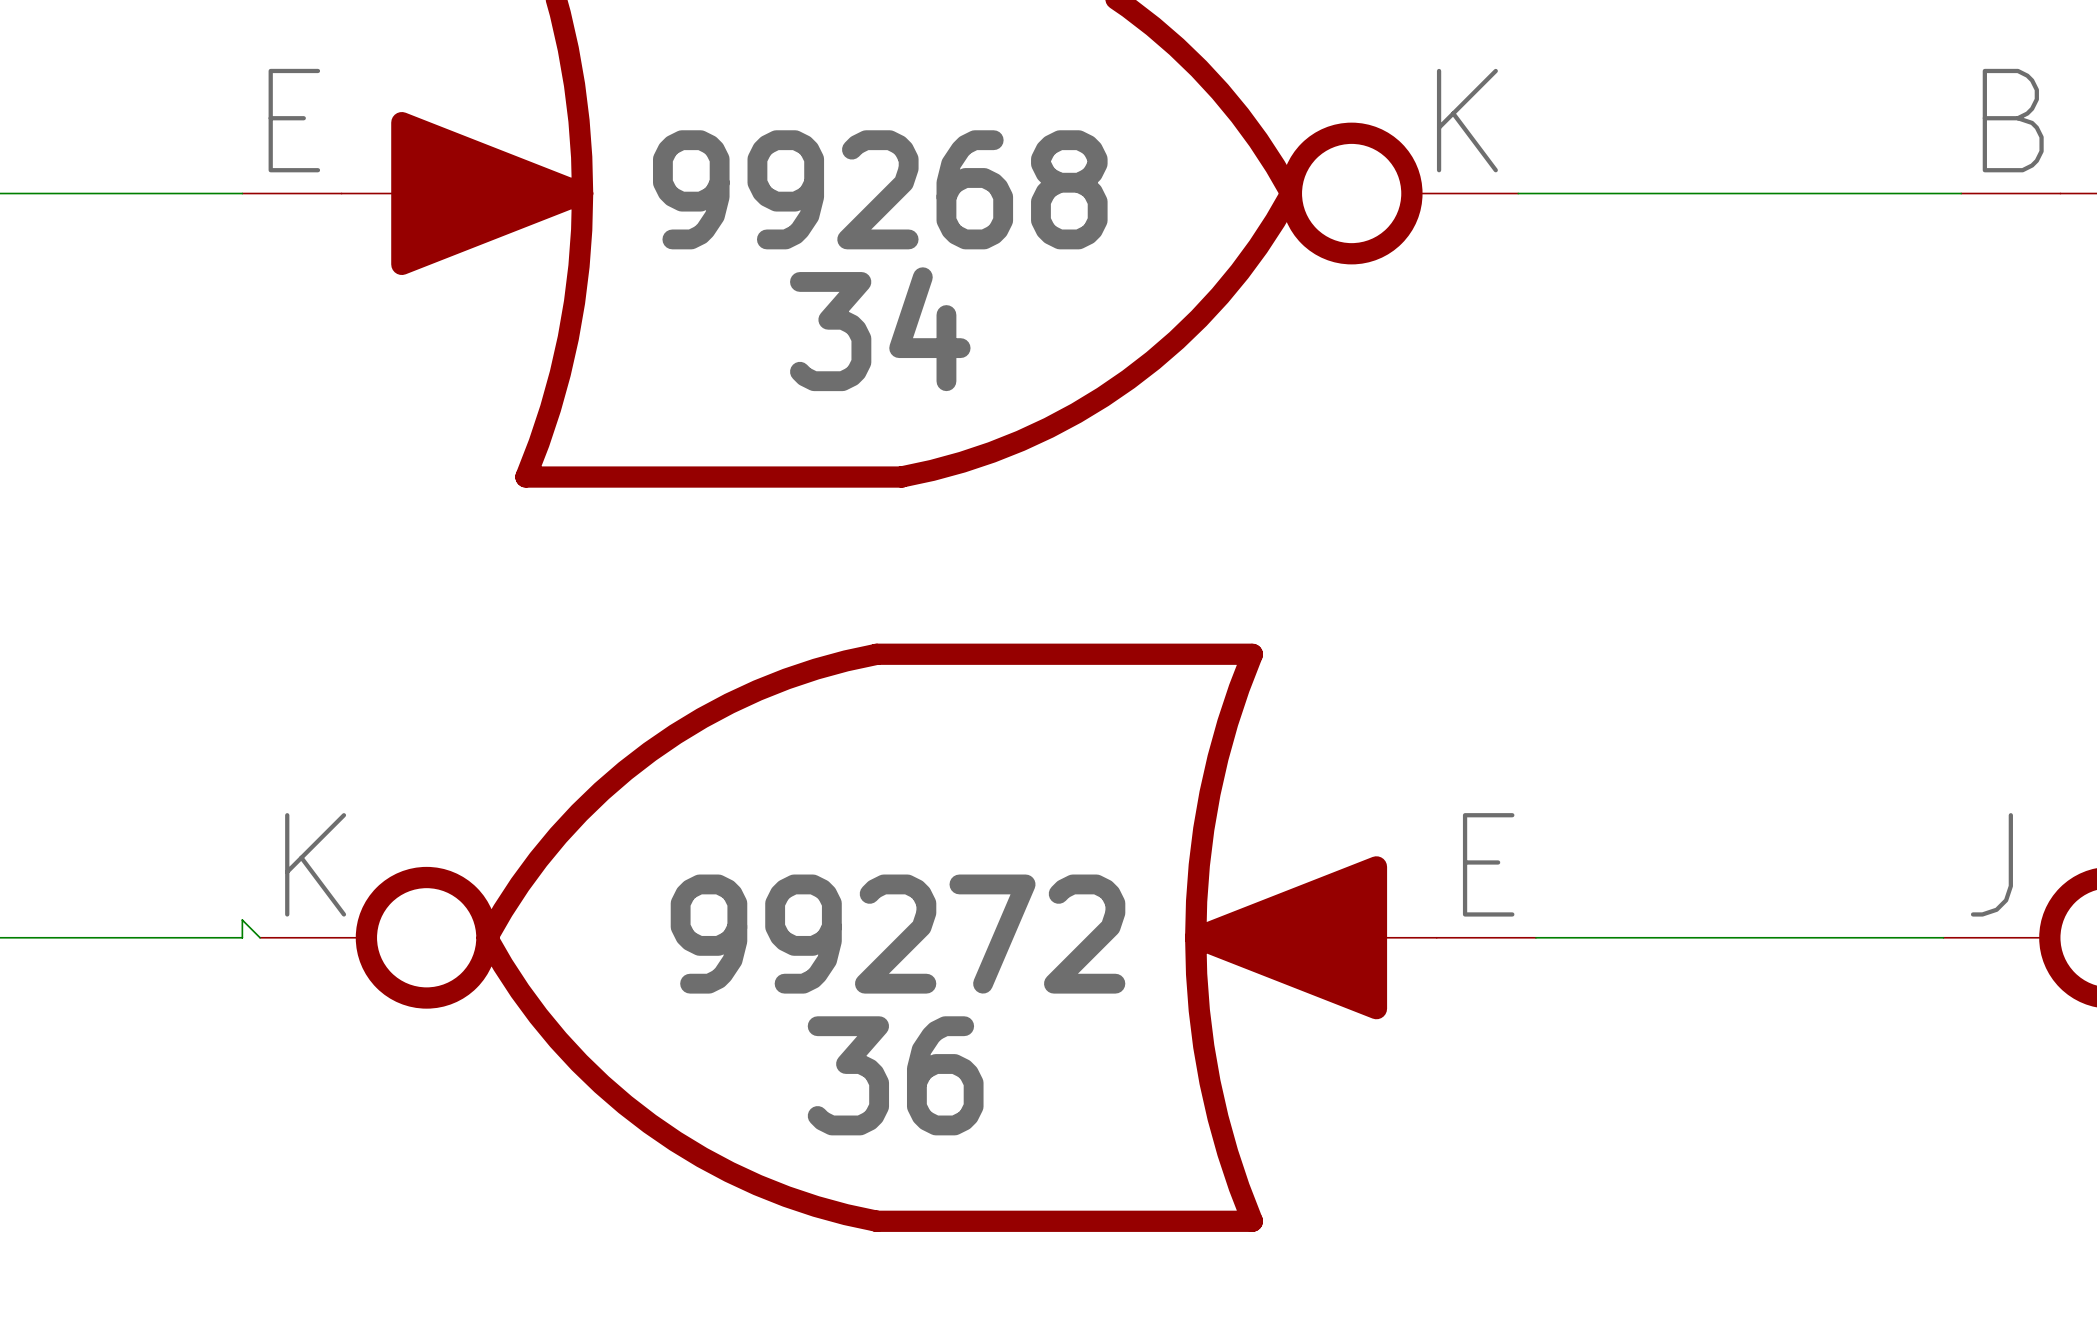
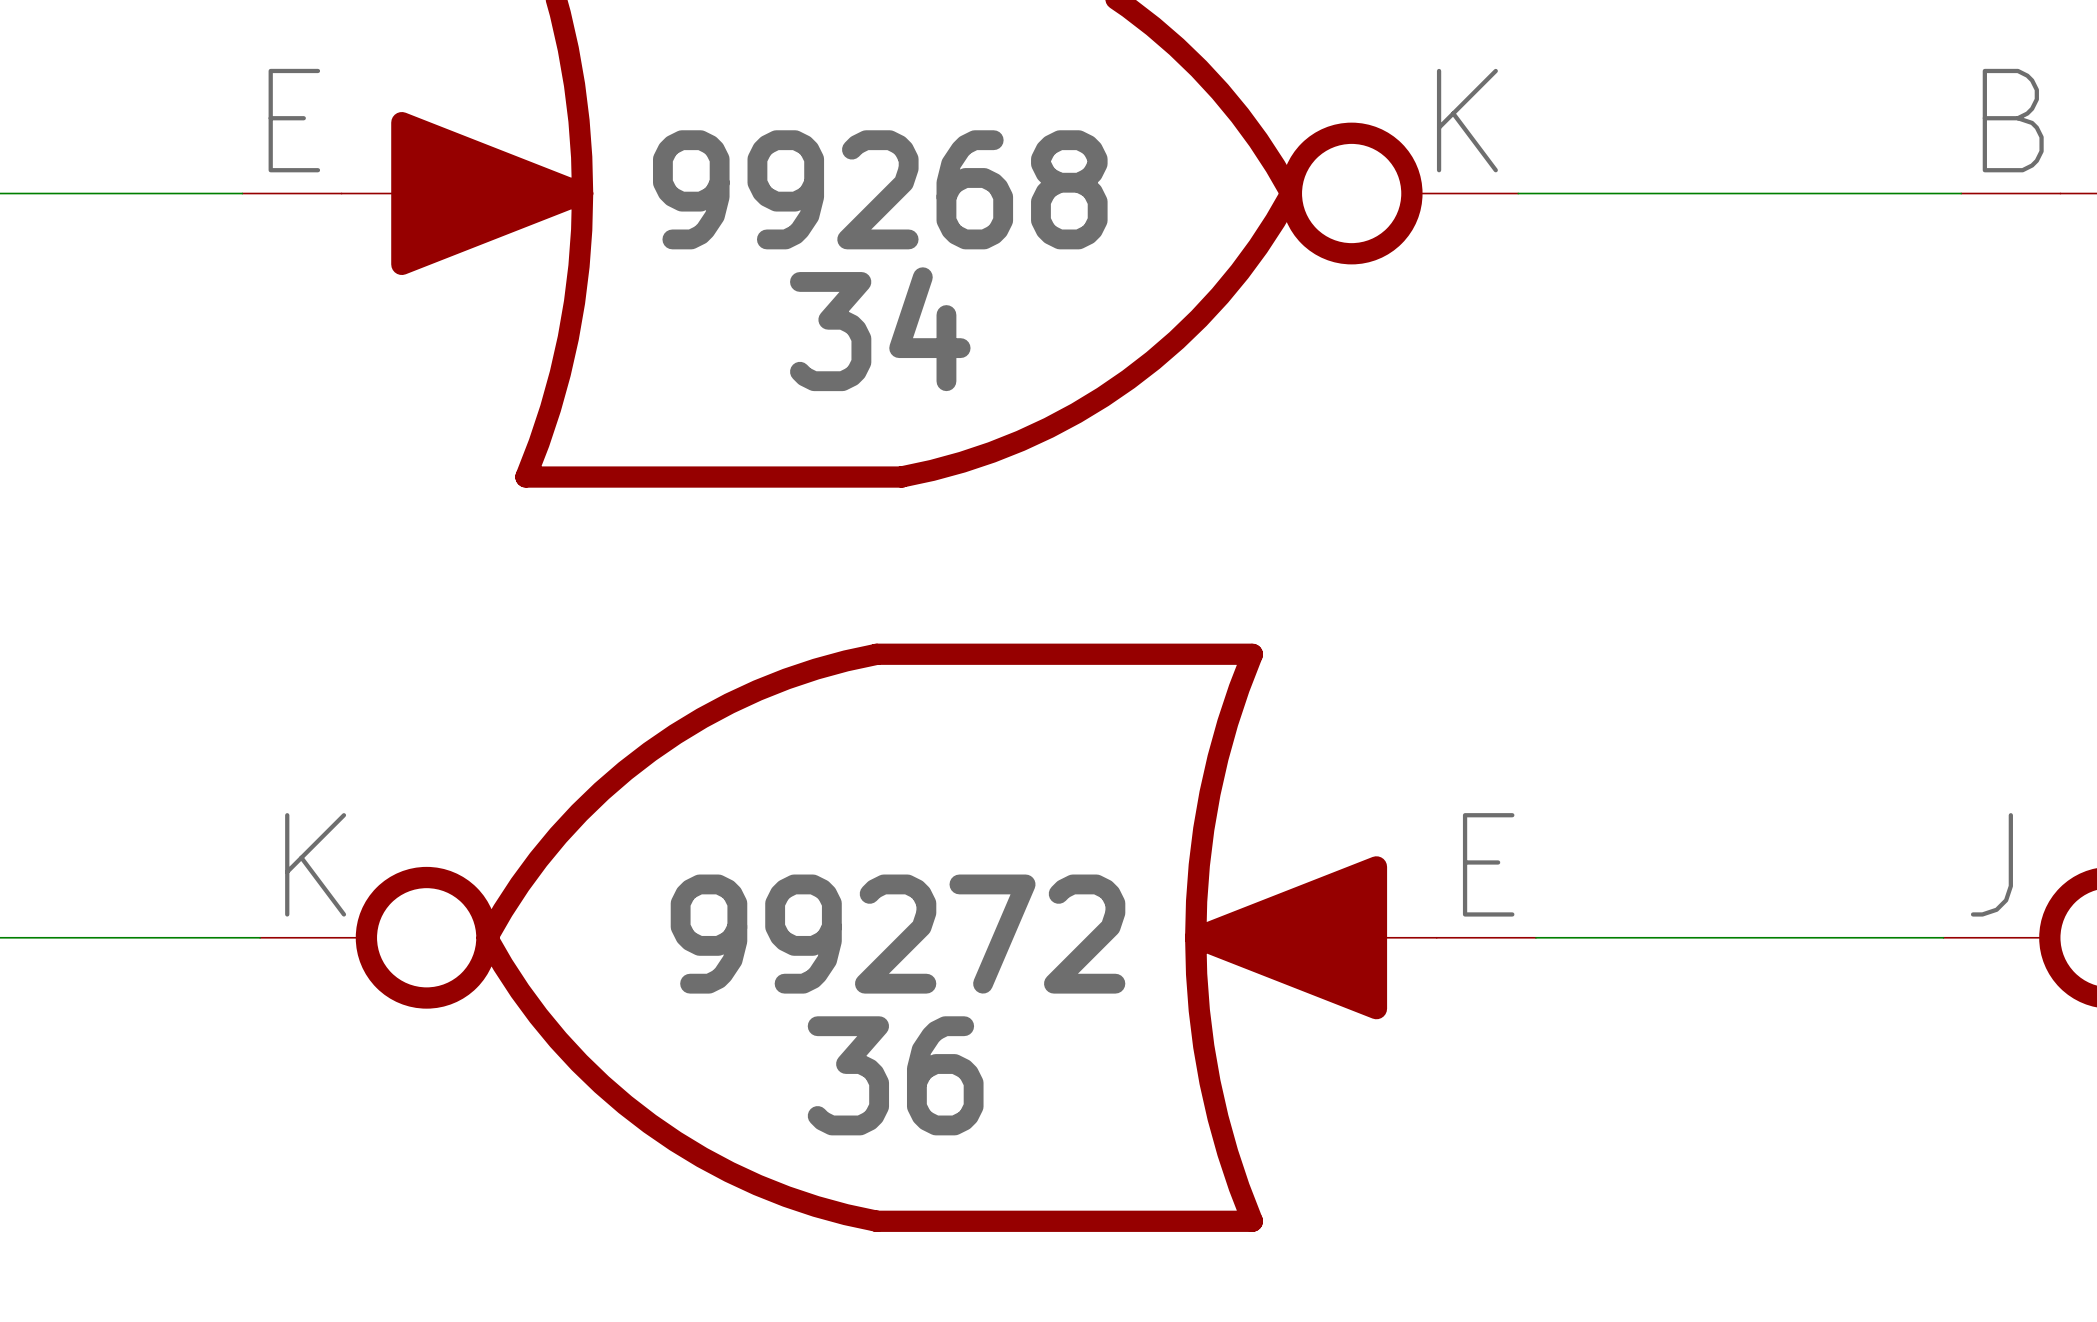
wire: (242, 937) (242, 920) (260, 937) -> (242, 937) (260, 937)

